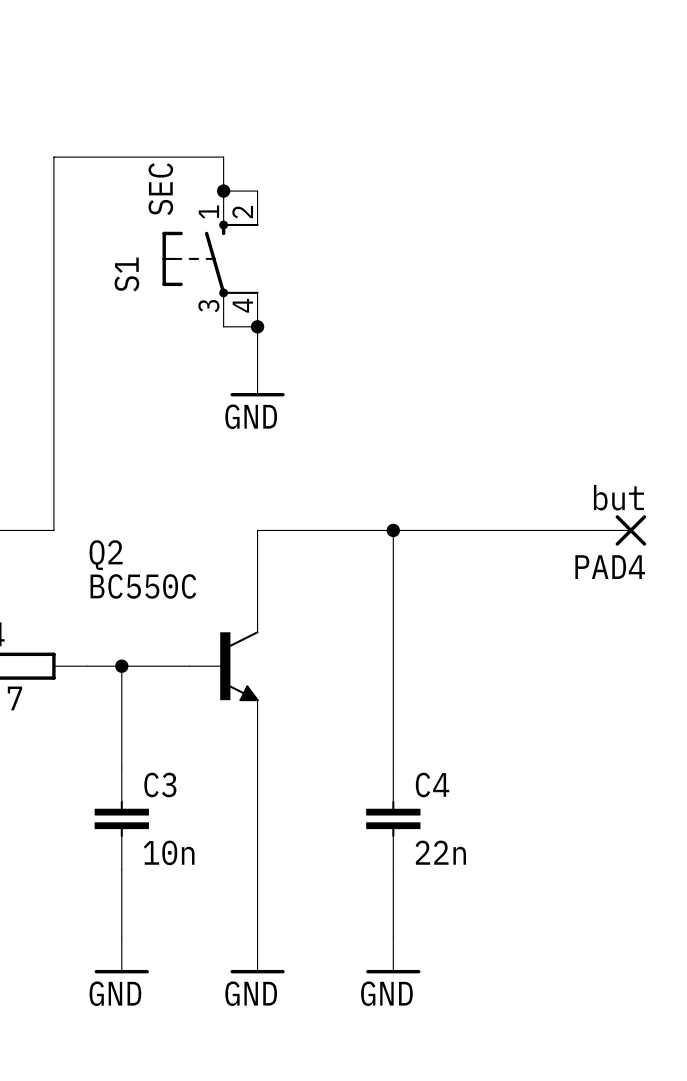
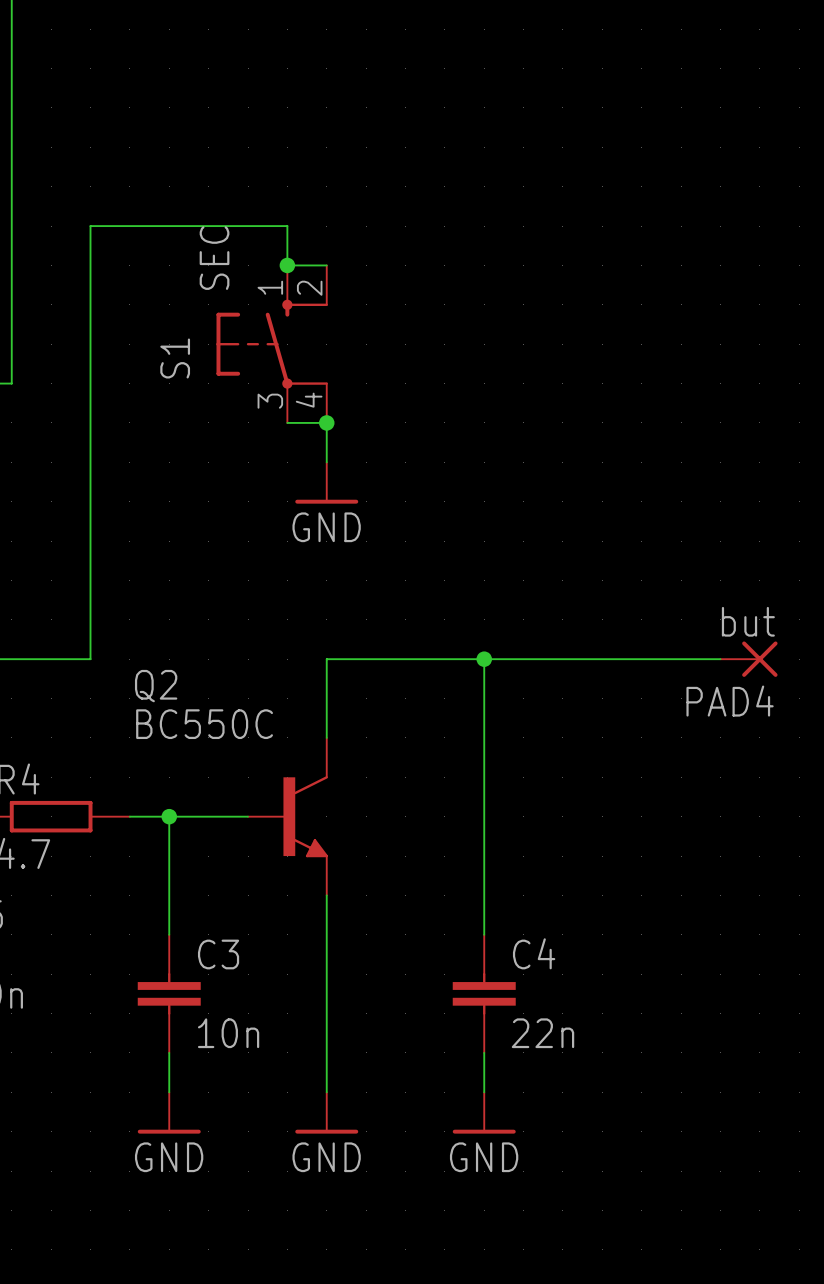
power symbol position: GND (121, 955) -> GND (169, 1112)
power symbol position: GND (257, 955) -> GND (326, 1112)
power symbol position: GND (393, 955) -> GND (484, 1112)

